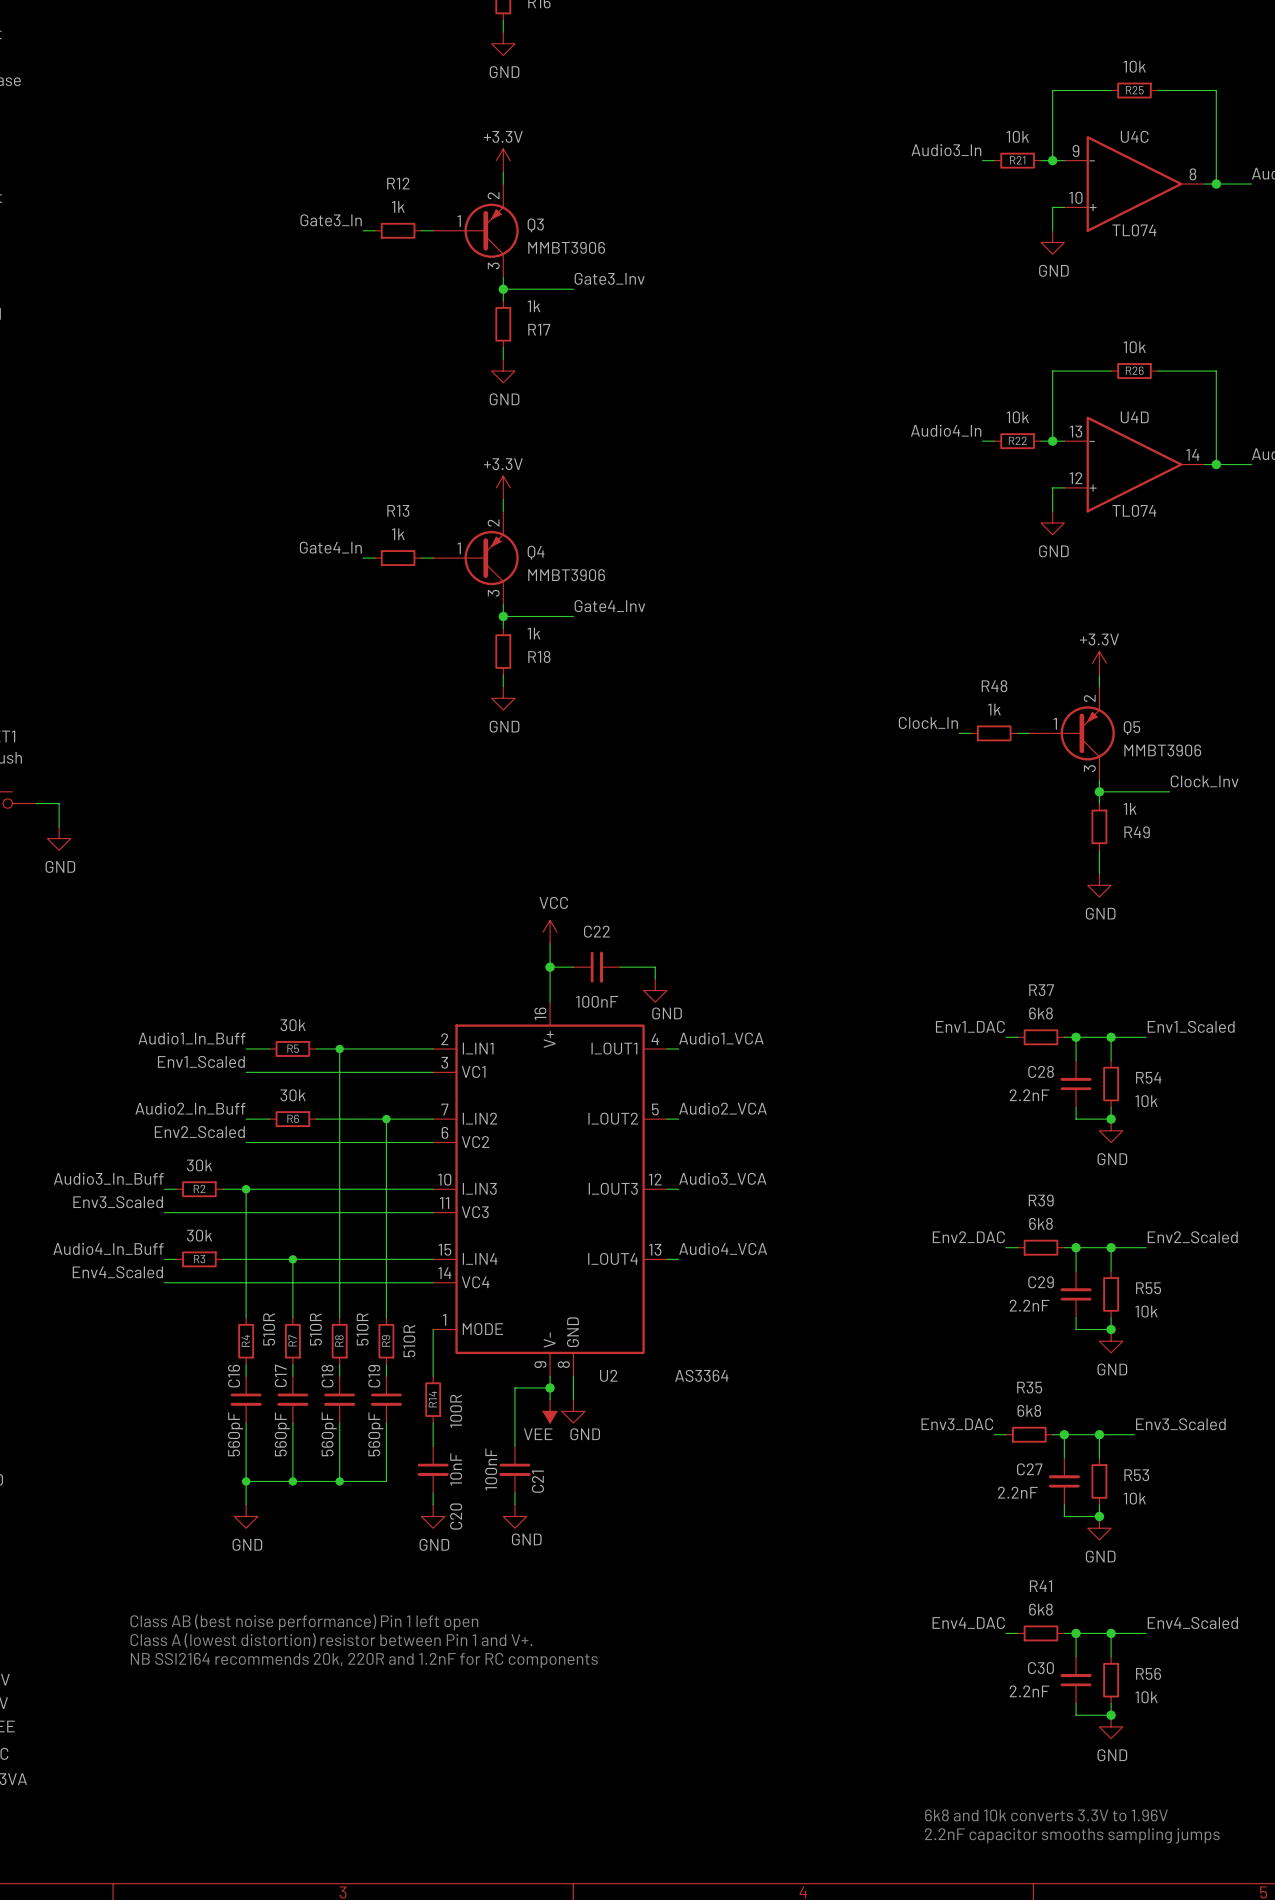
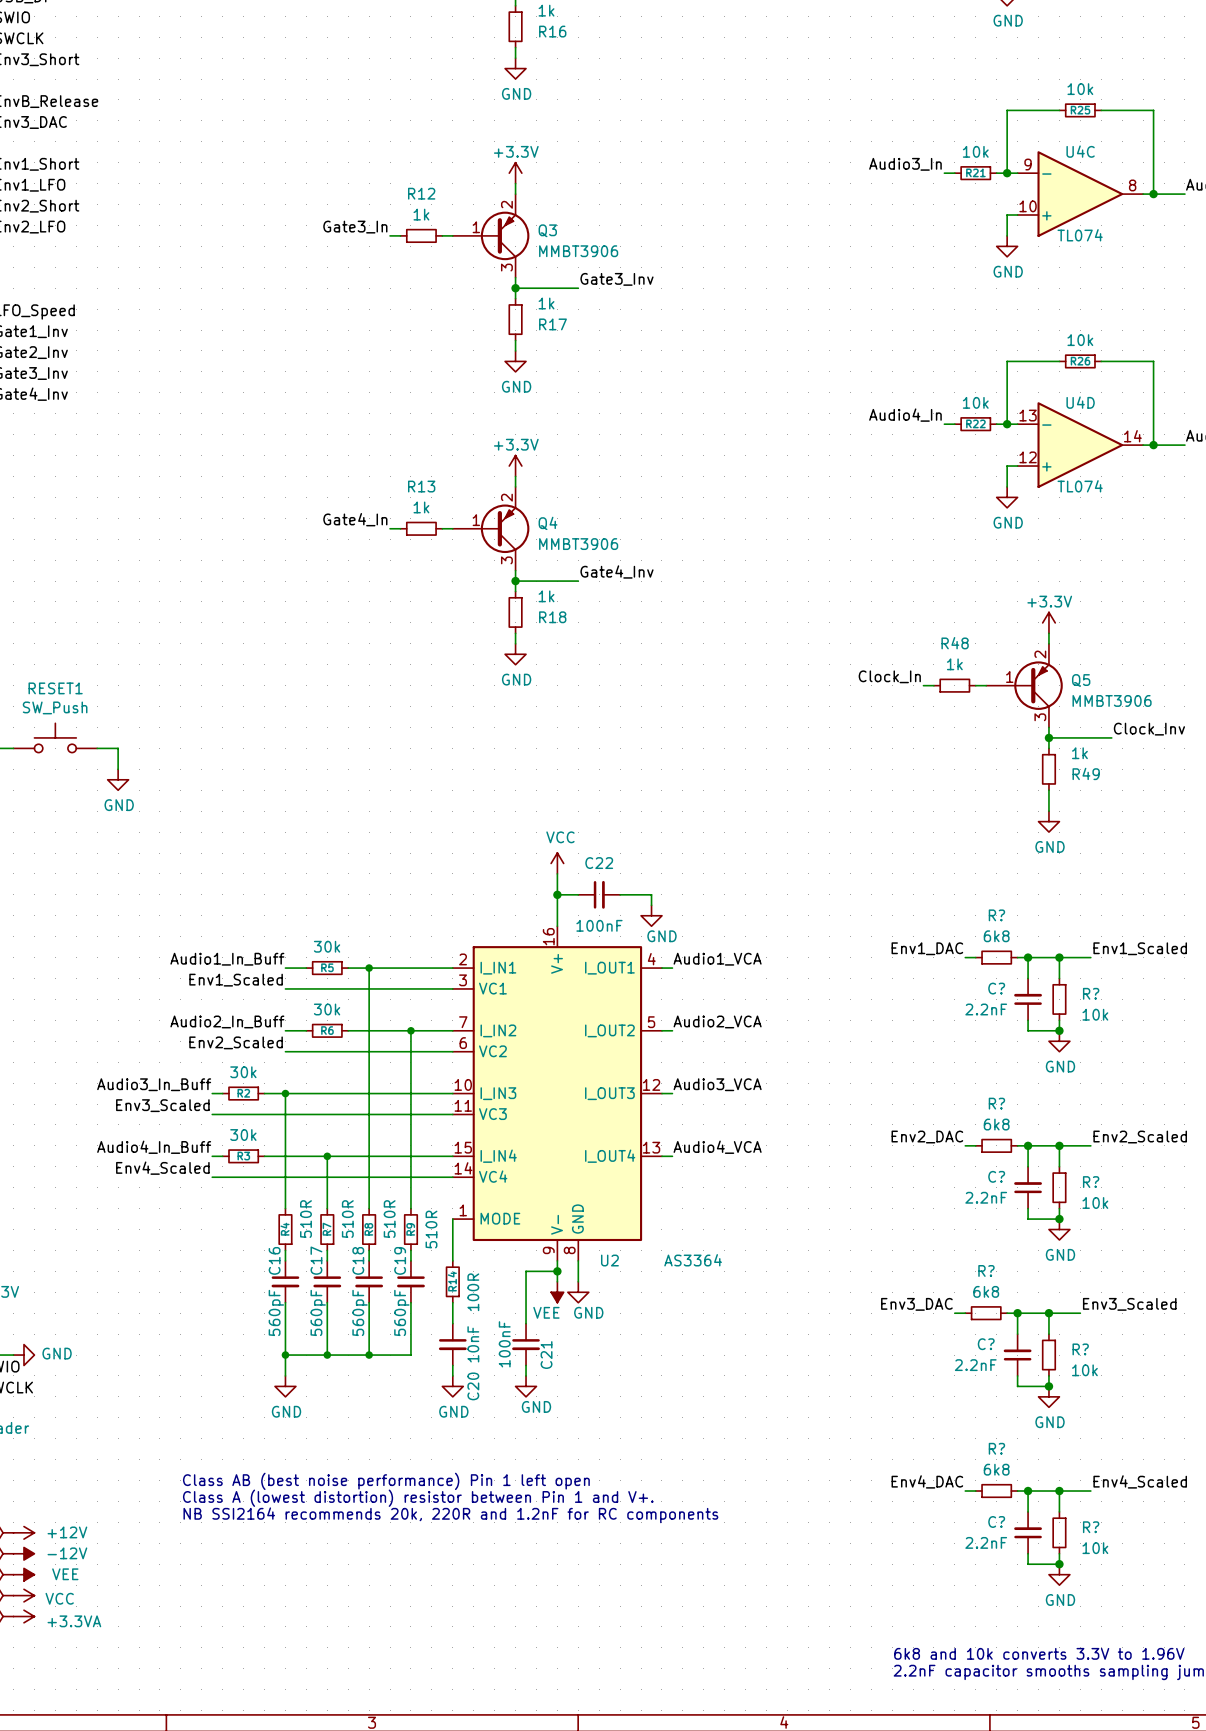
R37 name: R37 (1041, 990) -> R? (996, 915)
C28 name: C28 (1041, 1071) -> C? (996, 988)
R54 name: R54 (1148, 1077) -> R? (1091, 993)
R39 name: R39 (1041, 1200) -> R? (996, 1103)
C29 name: C29 (1041, 1282) -> C? (996, 1176)
R55 name: R55 (1148, 1288) -> R? (1091, 1182)
R35 name: R35 (1029, 1387) -> R? (986, 1270)
C27 name: C27 (1029, 1469) -> C? (986, 1344)
R53 name: R53 (1136, 1475) -> R? (1080, 1349)
R41 name: R41 (1040, 1586) -> R? (996, 1448)
C30 name: C30 (1040, 1668) -> C? (996, 1521)
R56 name: R56 (1148, 1673) -> R? (1091, 1527)

